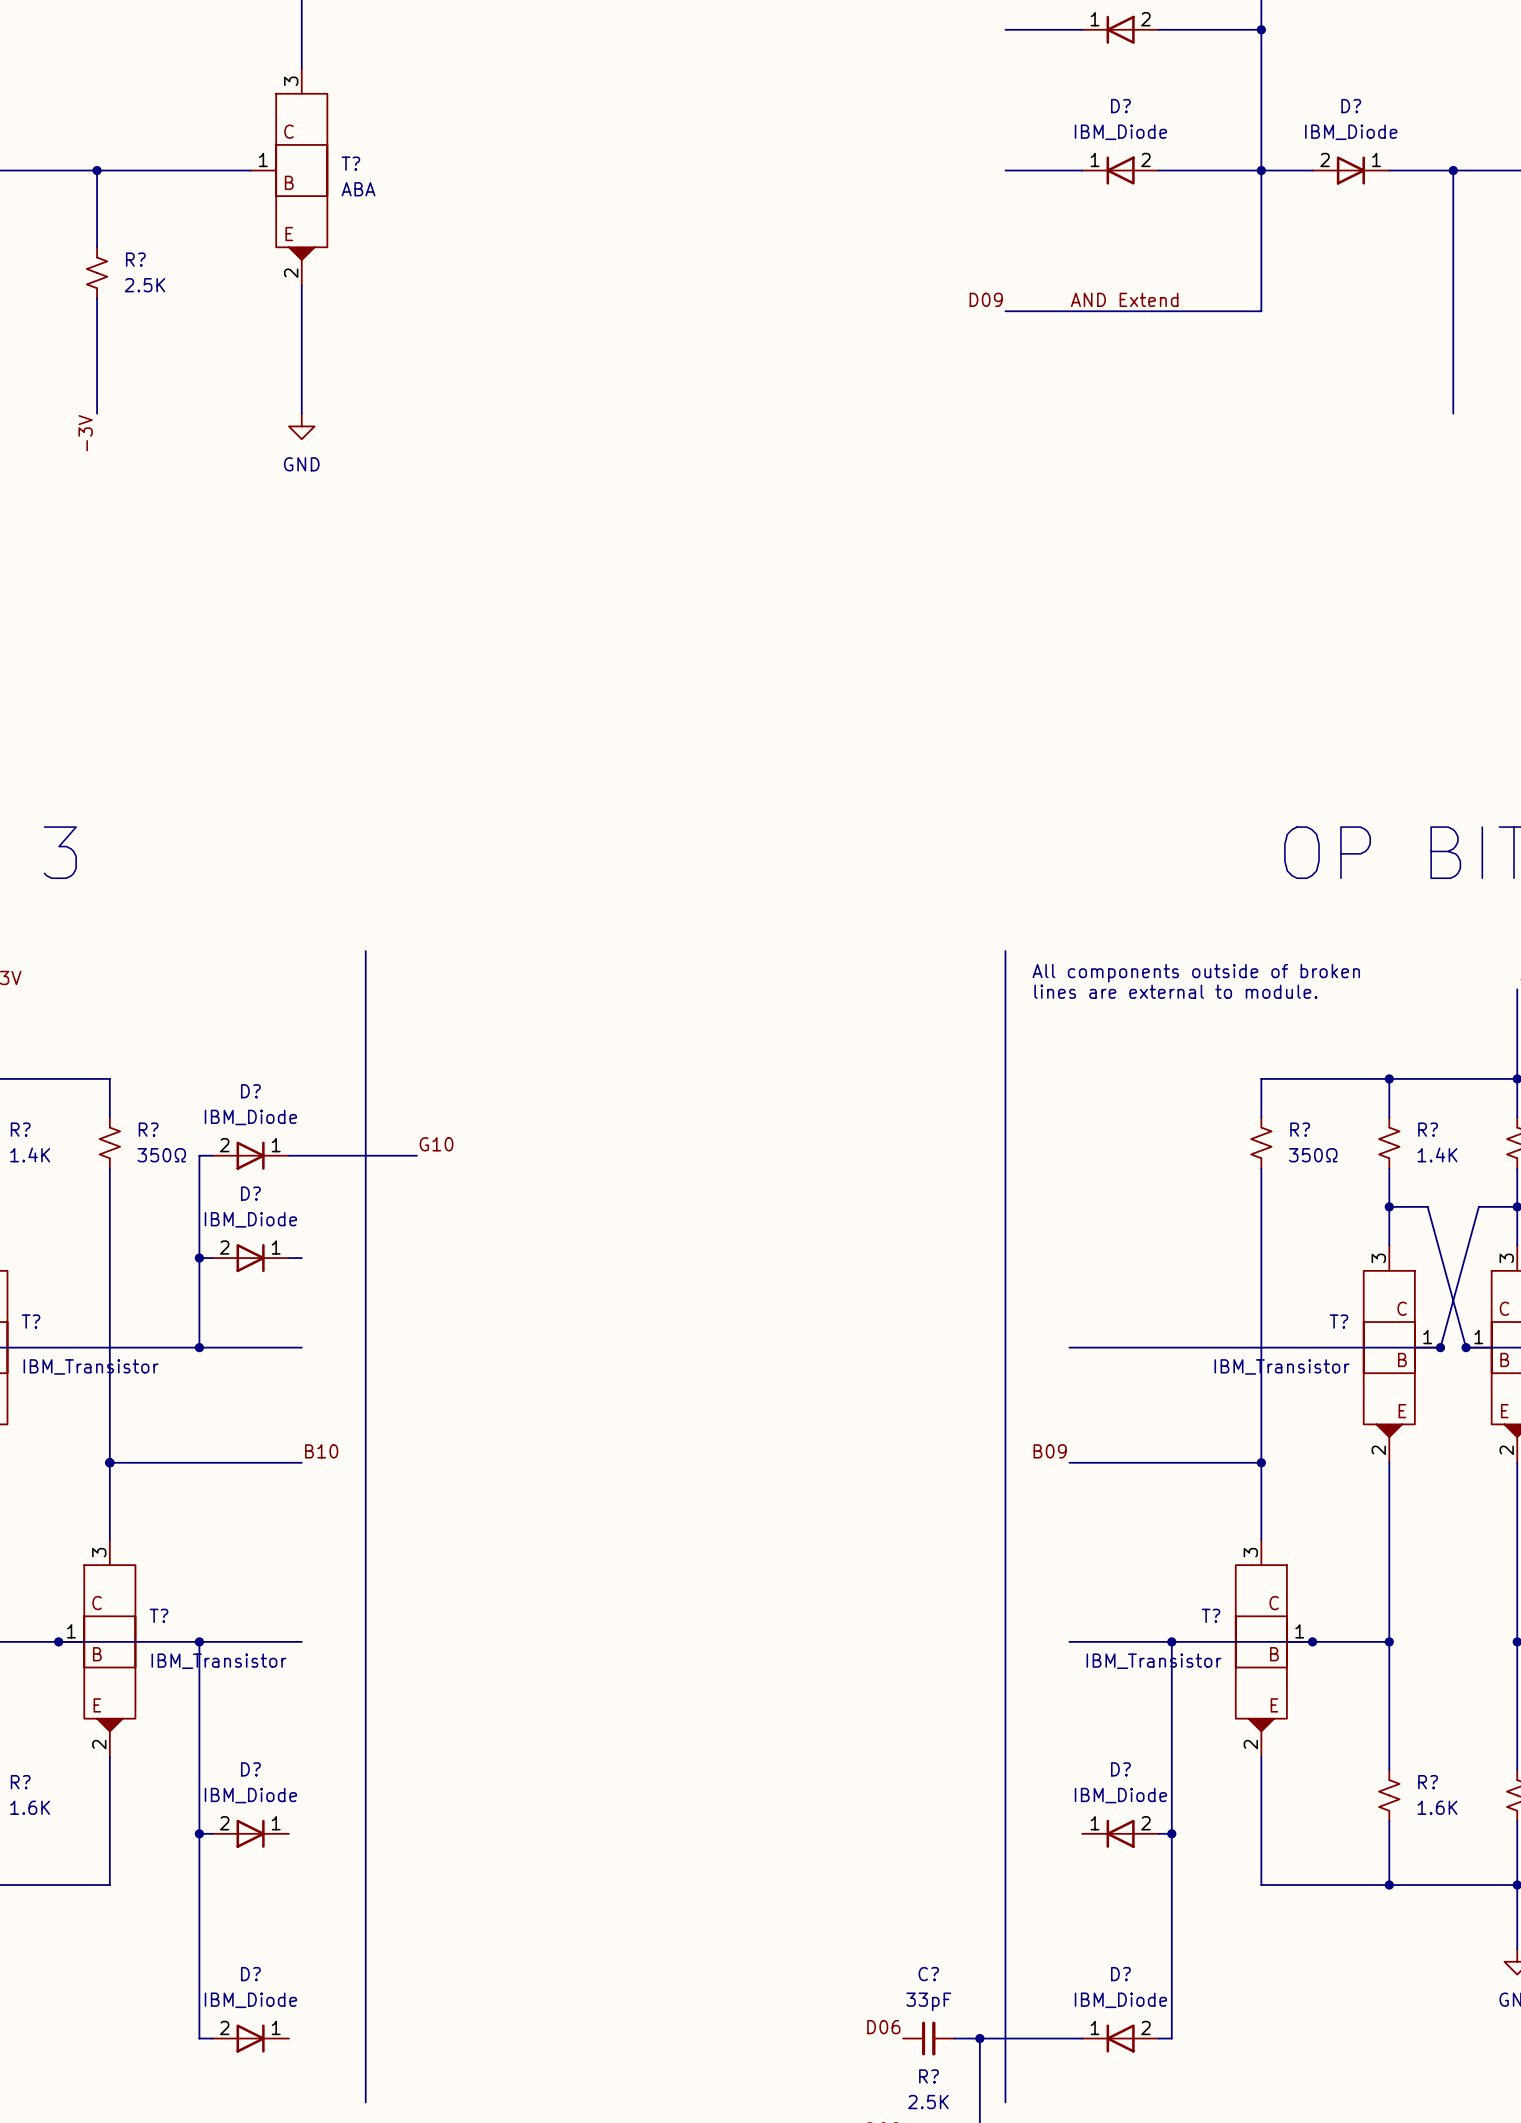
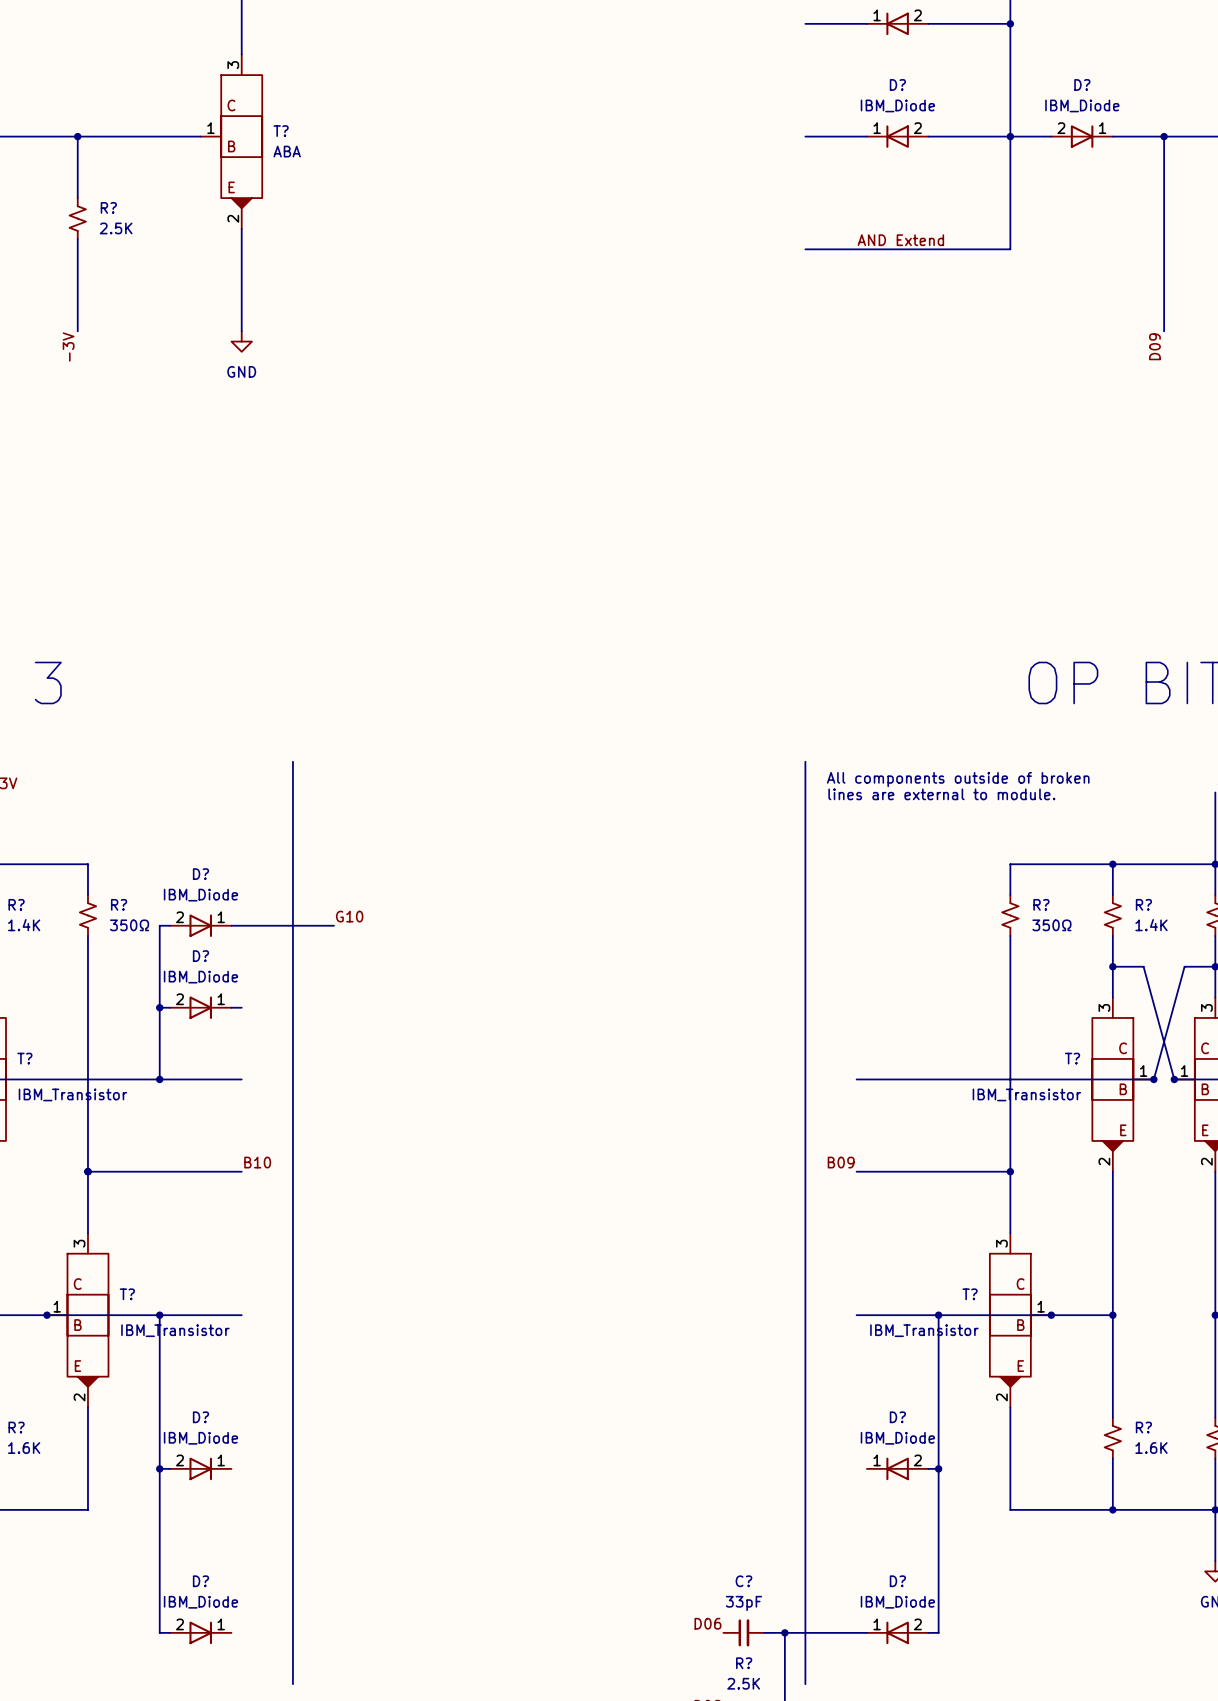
label: D09 (986, 299) -> none
label: none -> D09 (1154, 346)

